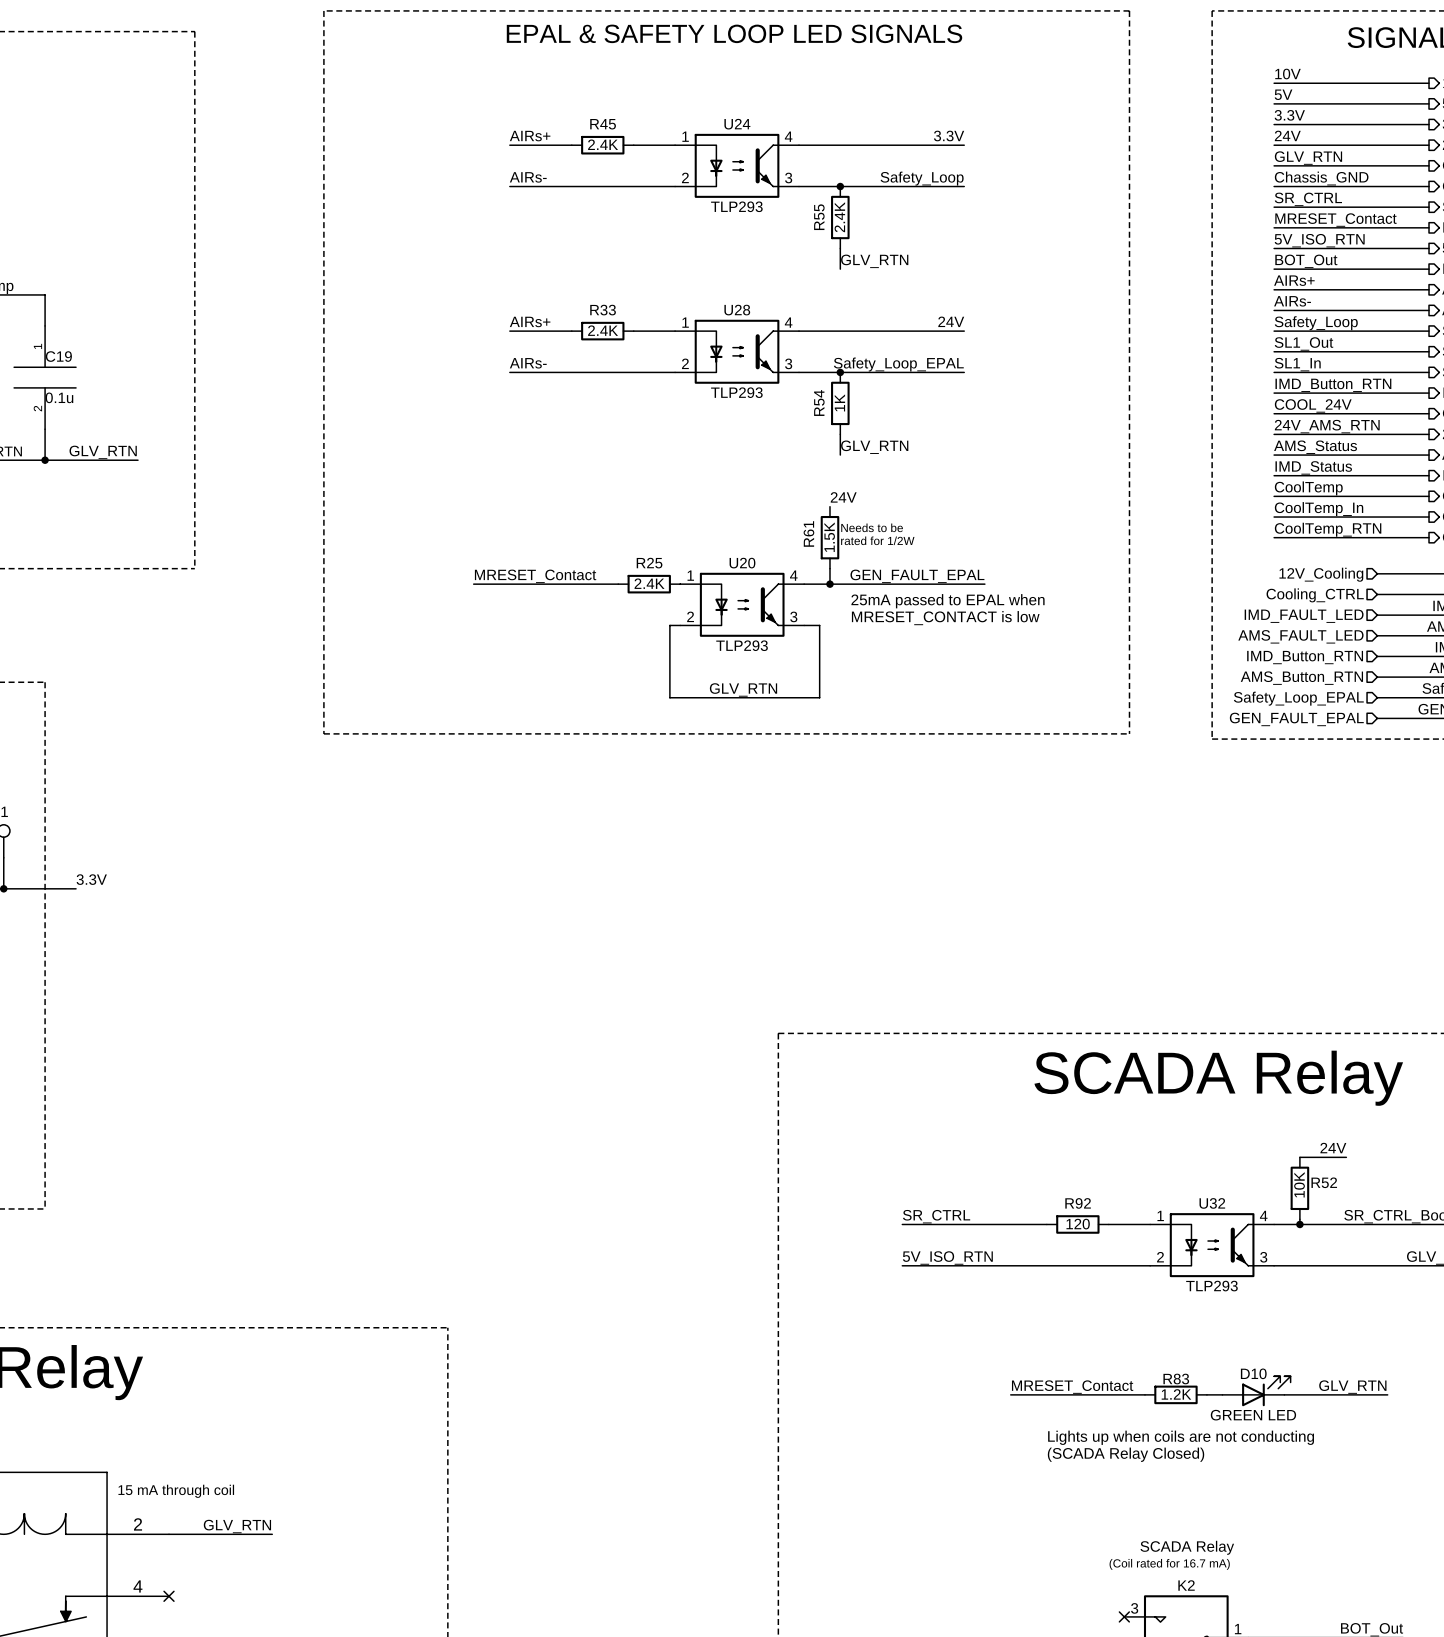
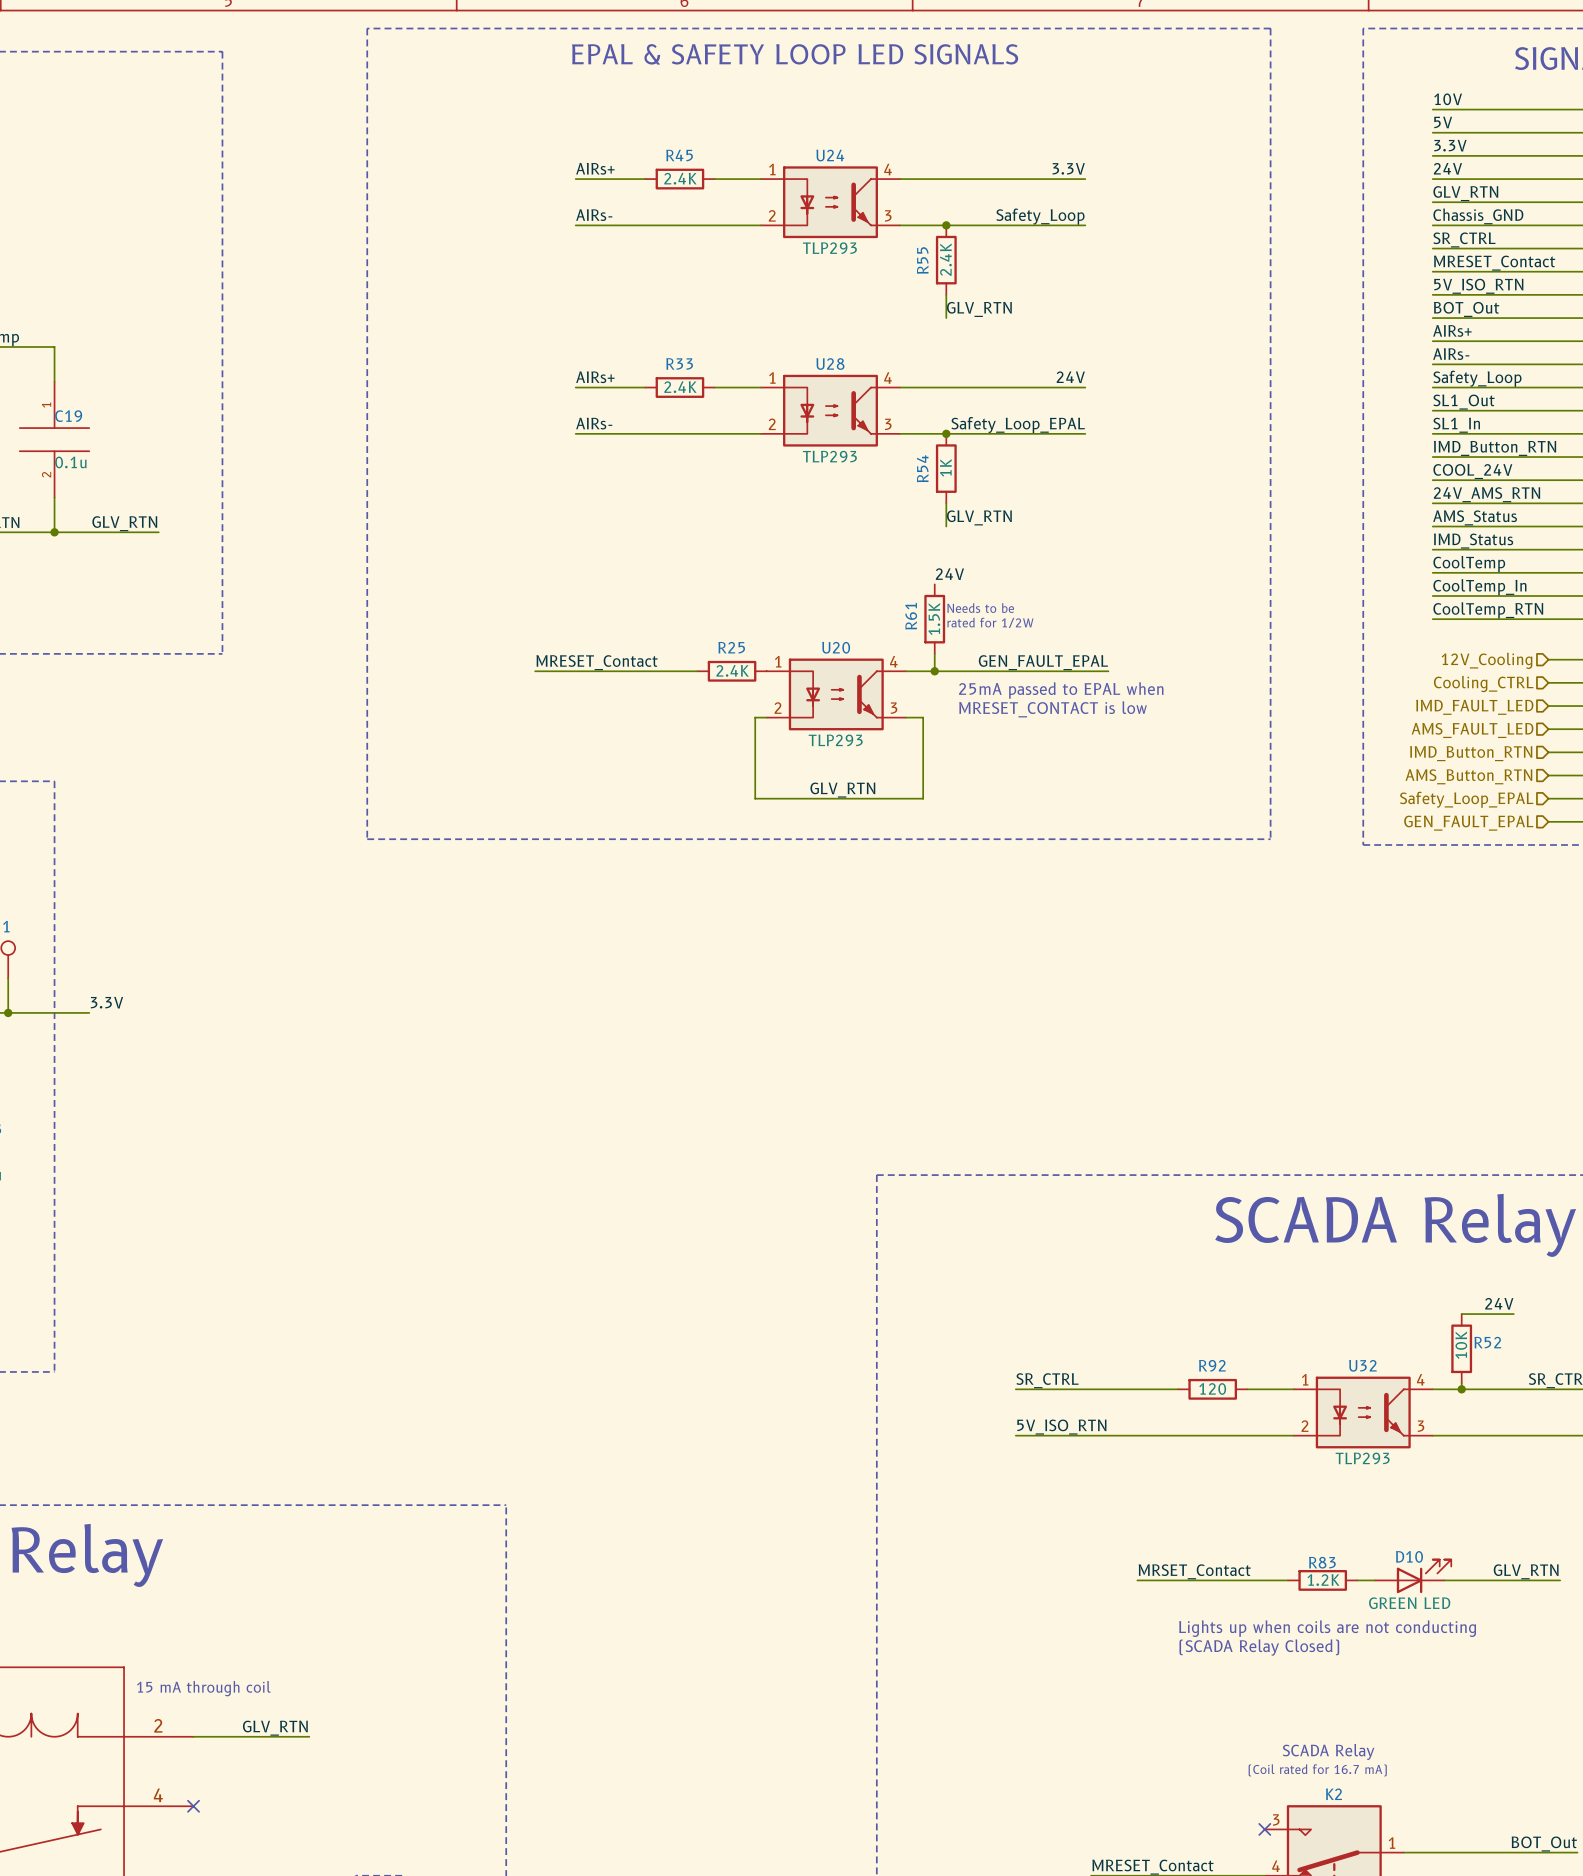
label: MRESET_Contact (1072, 1387) -> MRSET_Contact (1194, 1571)

